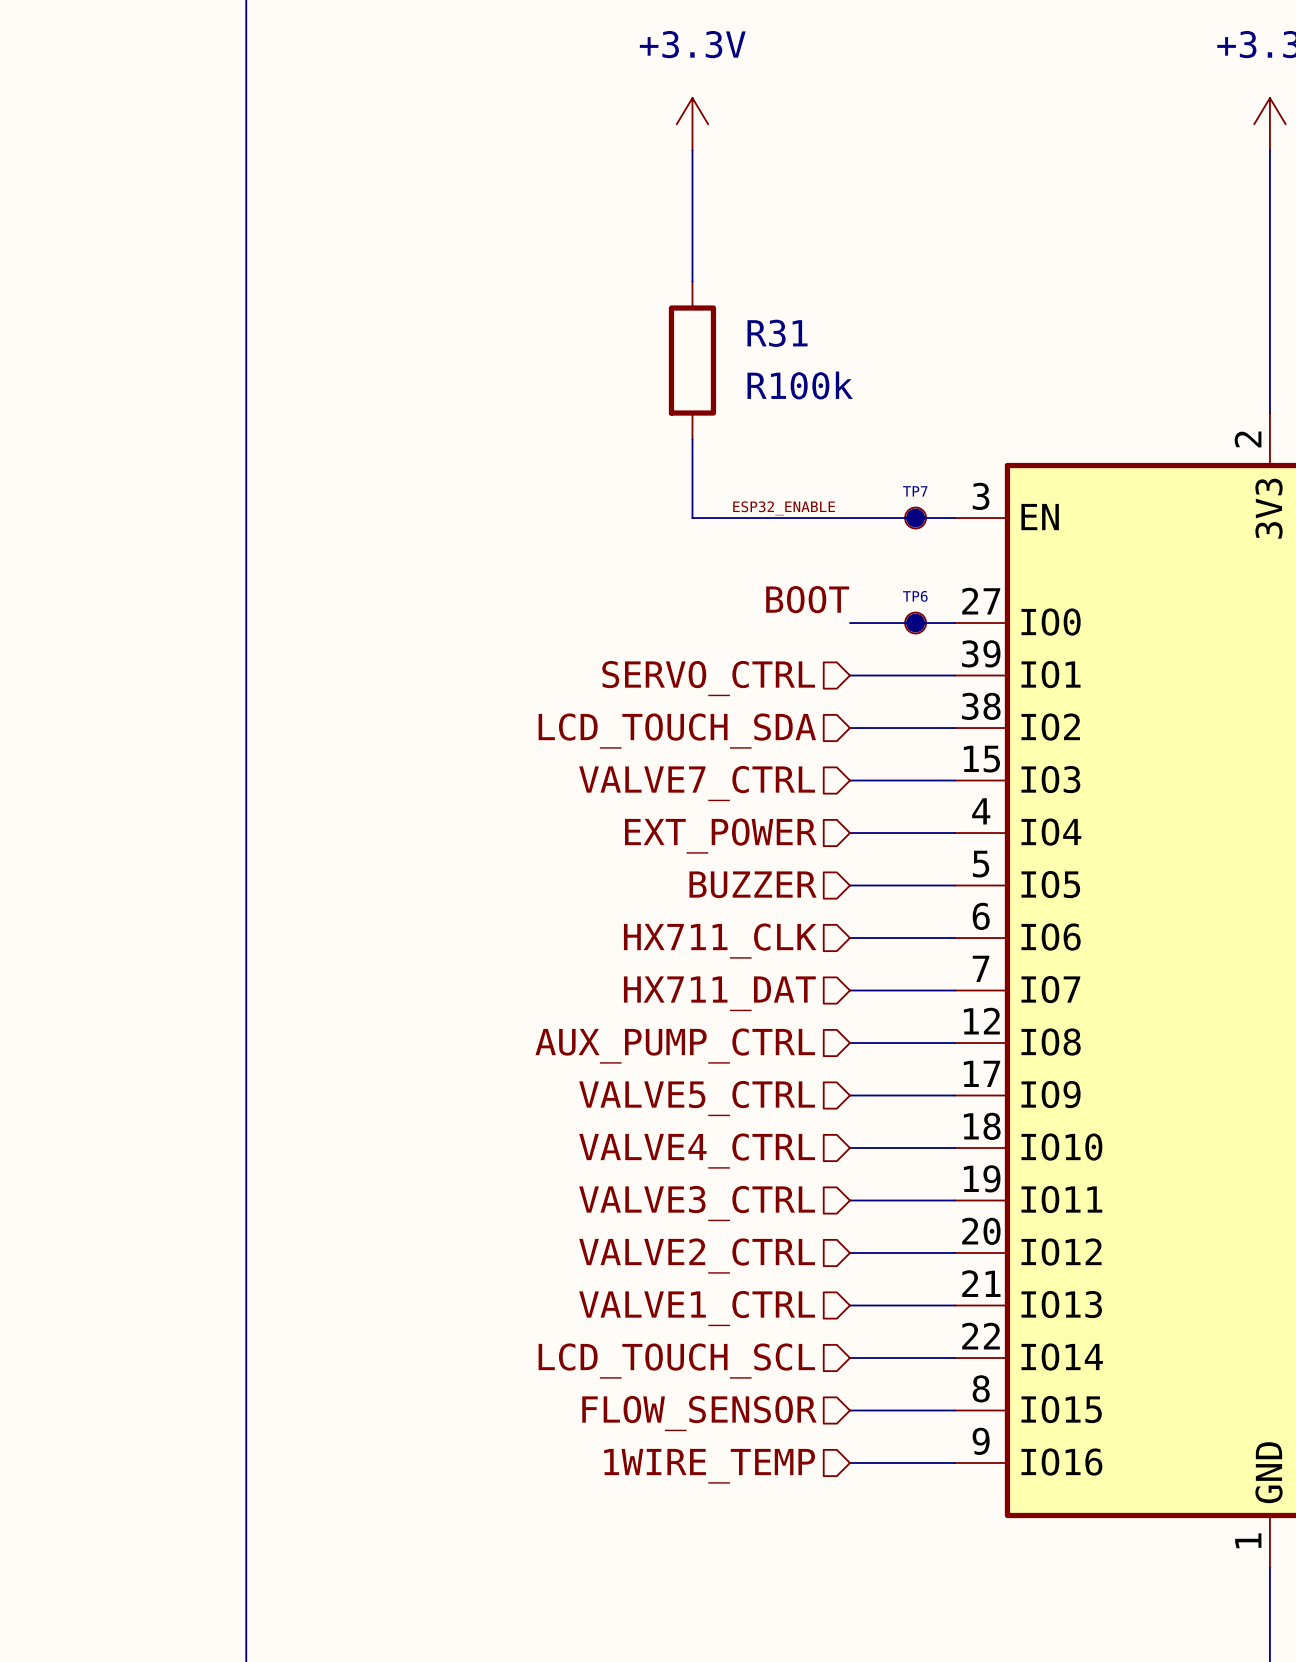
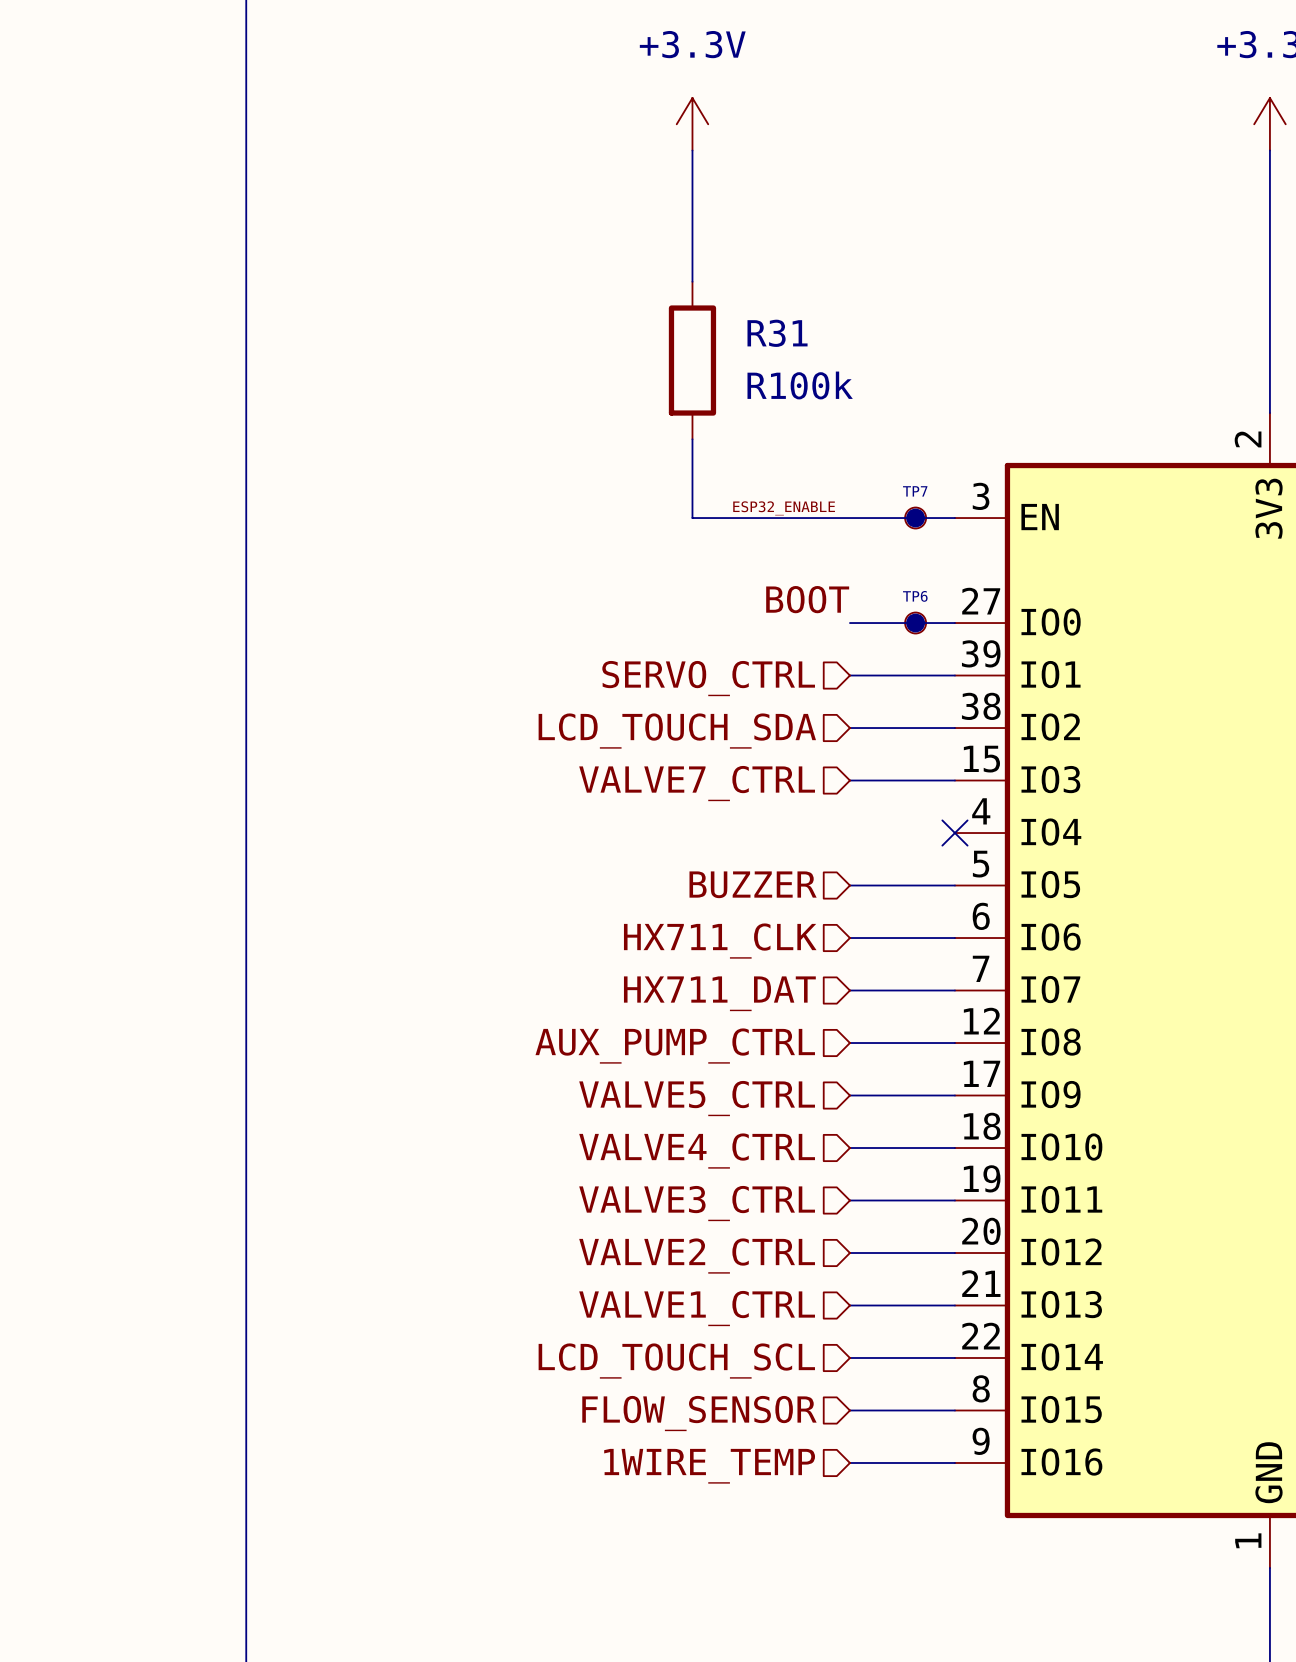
wire: (849, 833) (954, 833) -> none
no-connect mark: none -> (954, 833)
hierarchical label: EXT_POWER (720, 836) -> none

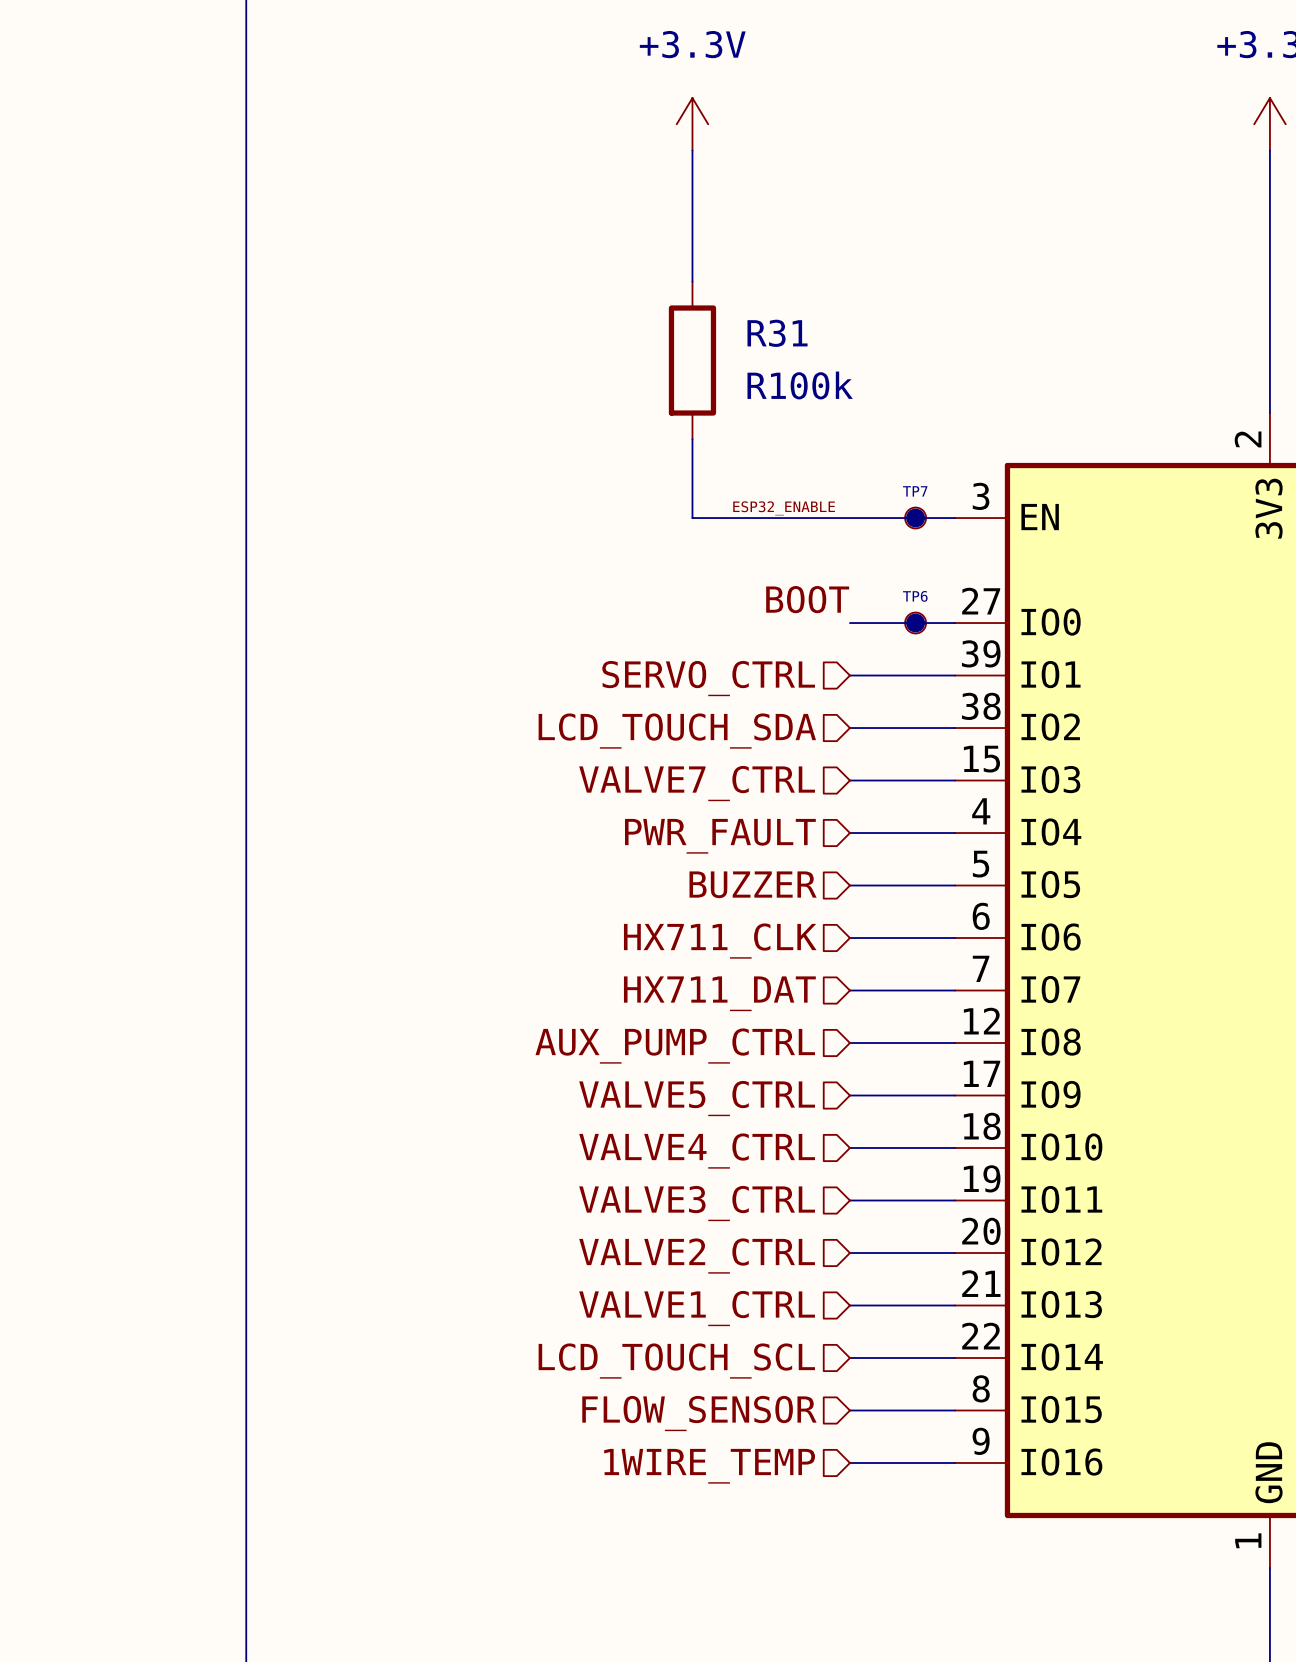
wire: none -> (849, 833) (954, 833)
no-connect mark: (954, 833) -> none
hierarchical label: none -> PWR_FAULT (720, 836)

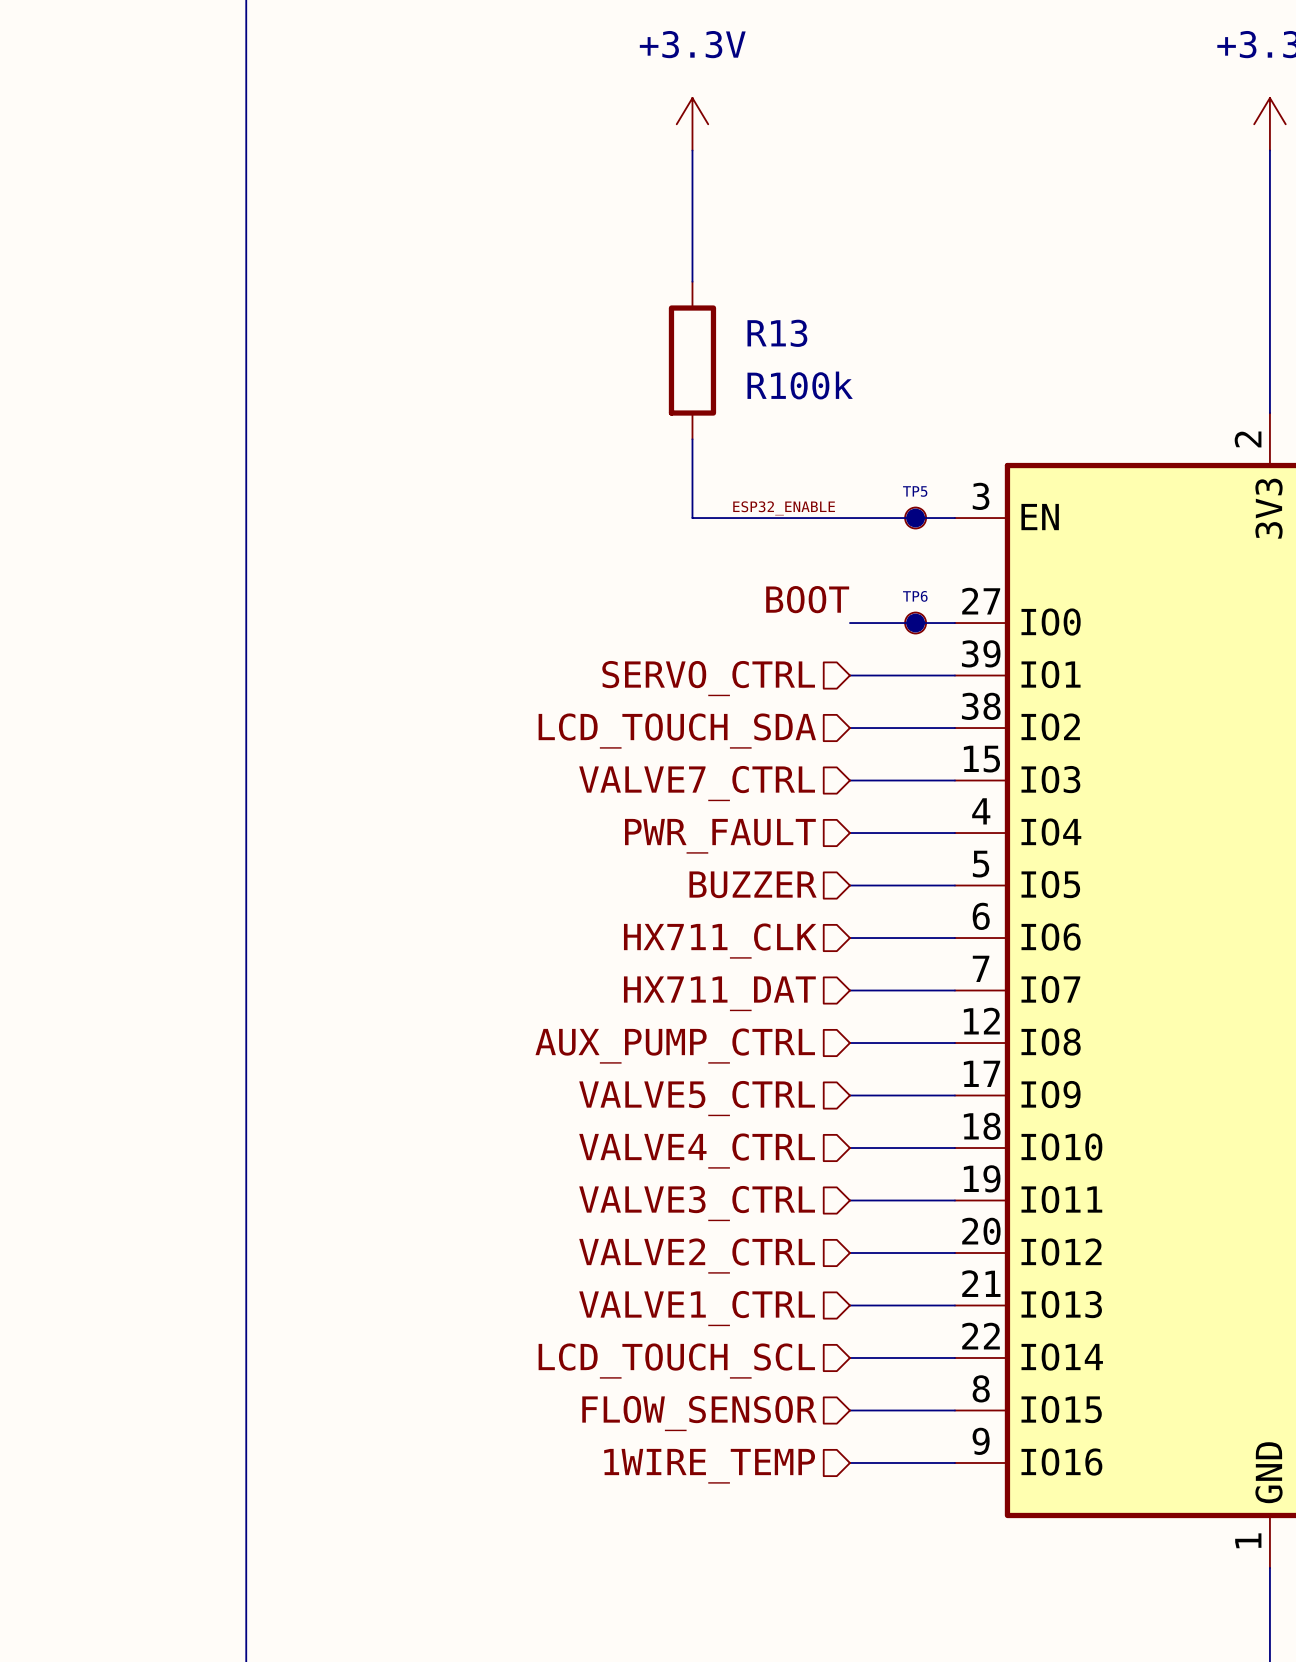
R31 name: R31 (777, 333) -> R13 (777, 333)
TP7 name: TP7 (915, 491) -> TP5 (915, 491)

